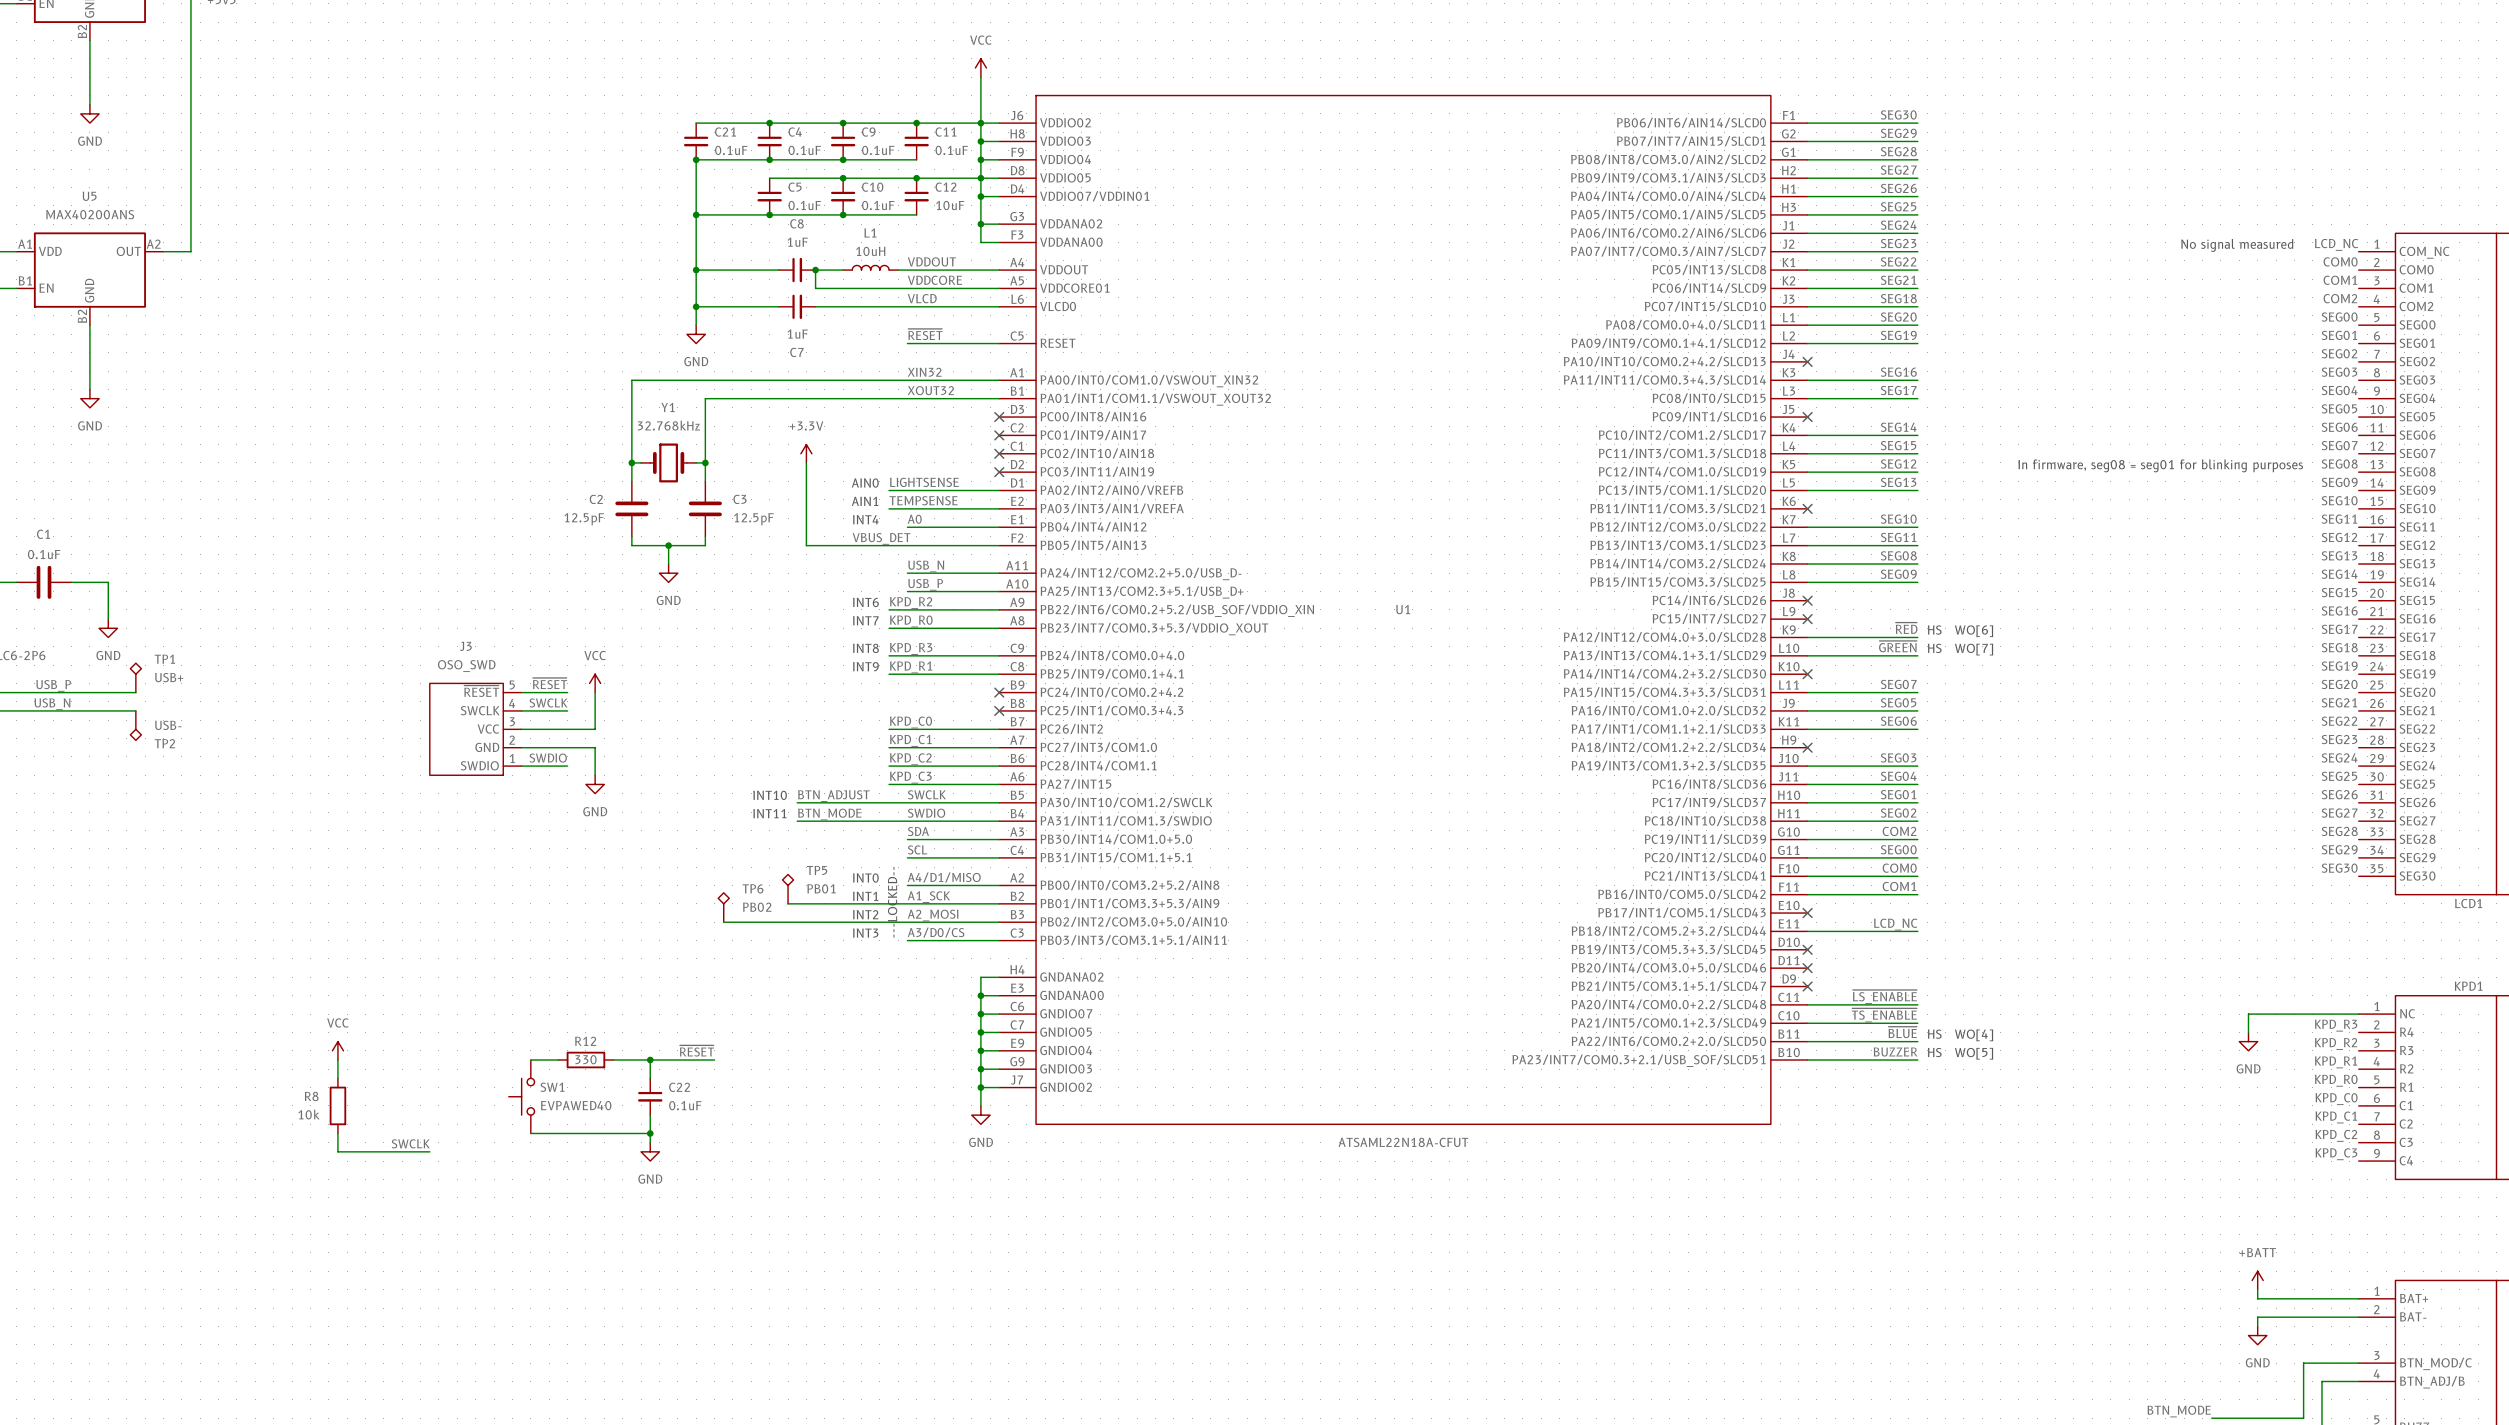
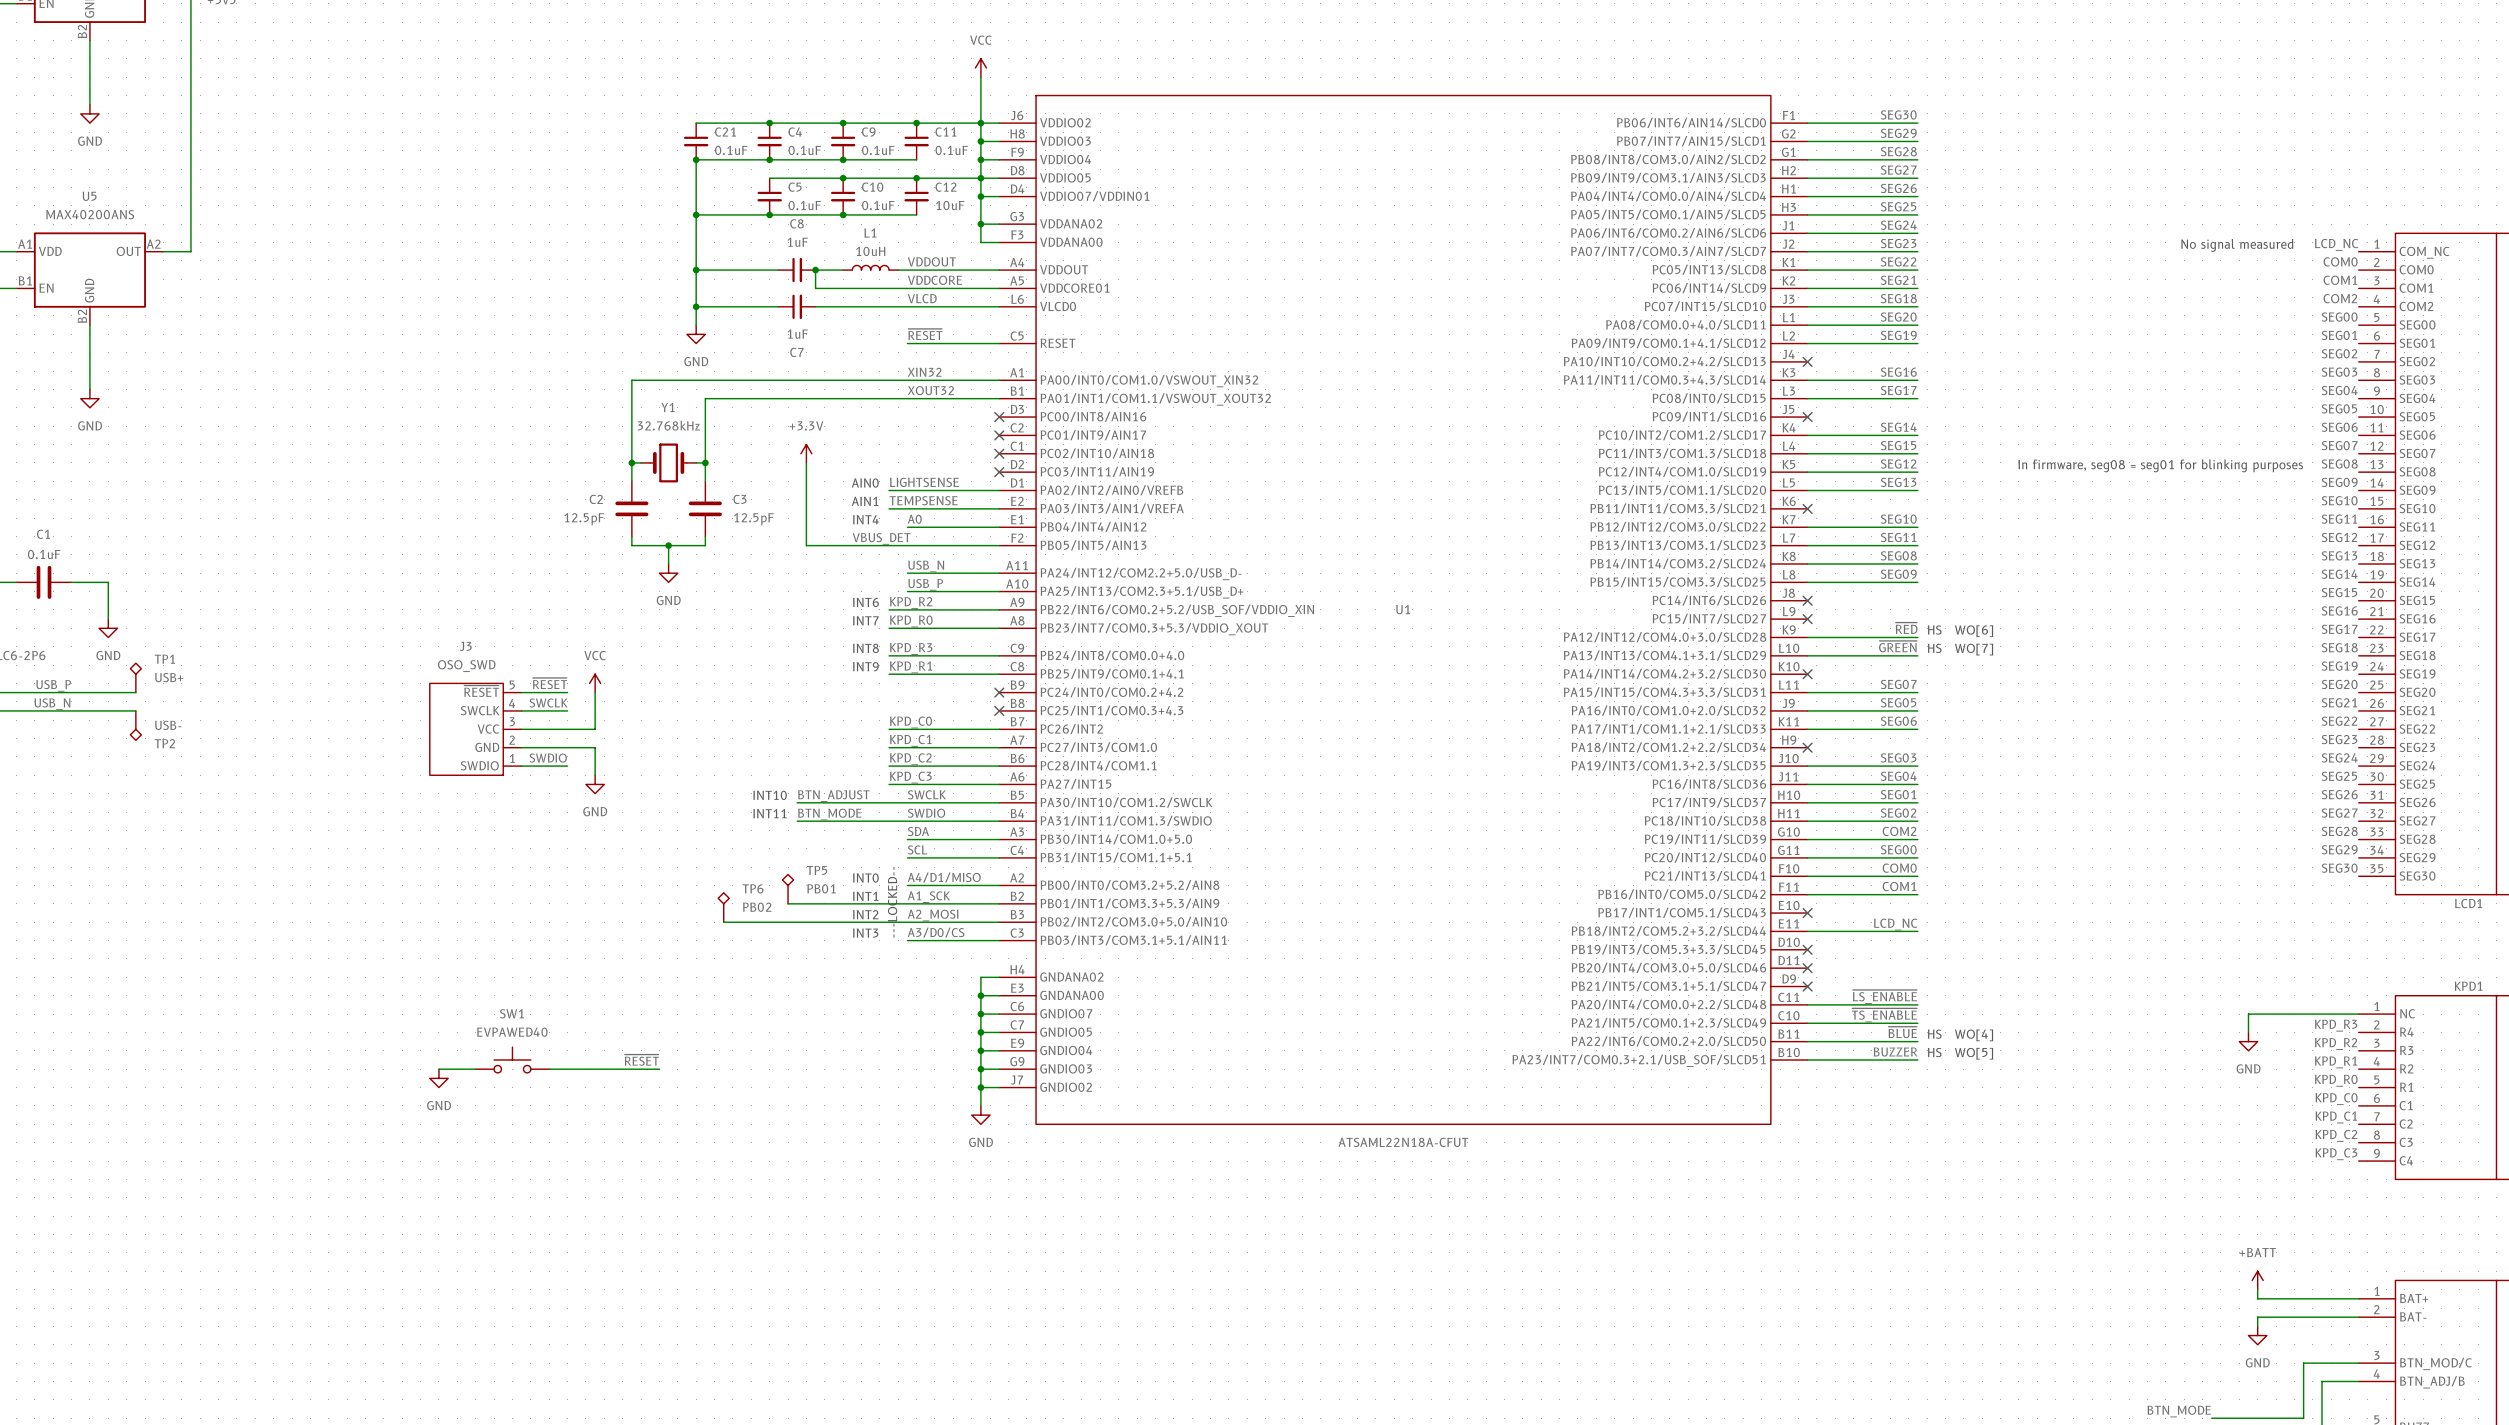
power symbol: VCC (337, 1050) -> none
label position: ~{RESET} (696, 1050) -> ~{RESET} (641, 1060)
wire: (337, 1060) (337, 1078) -> none
wire: (530, 1060) (558, 1060) -> none
R12: 330 (585, 1060) -> none
wire: (613, 1060) (714, 1060) -> none
wire: (650, 1060) (650, 1078) -> none
junction: (650, 1060) -> none
wire: none -> (438, 1069) (475, 1069)
wire: none -> (549, 1069) (659, 1069)
power symbol: none -> GND (438, 1078)
SW1 name position: SW1 (552, 1087) -> SW1 (511, 1013)
SW1 rotation: 0° (521, 1096) -> 90° clockwise (512, 1060)
C22: 0.1uF (650, 1096) -> none
R8: 10k (337, 1105) -> none
SW1 value position: EVPAWED40 (576, 1105) -> EVPAWED40 (512, 1032)
wire: (650, 1115) (650, 1142) -> none
wire: (337, 1133) (337, 1151) (429, 1151) -> none
wire: (530, 1133) (650, 1133) -> none
junction: (650, 1133) -> none
label: SWCLK (410, 1143) -> none
power symbol: GND (650, 1151) -> none

